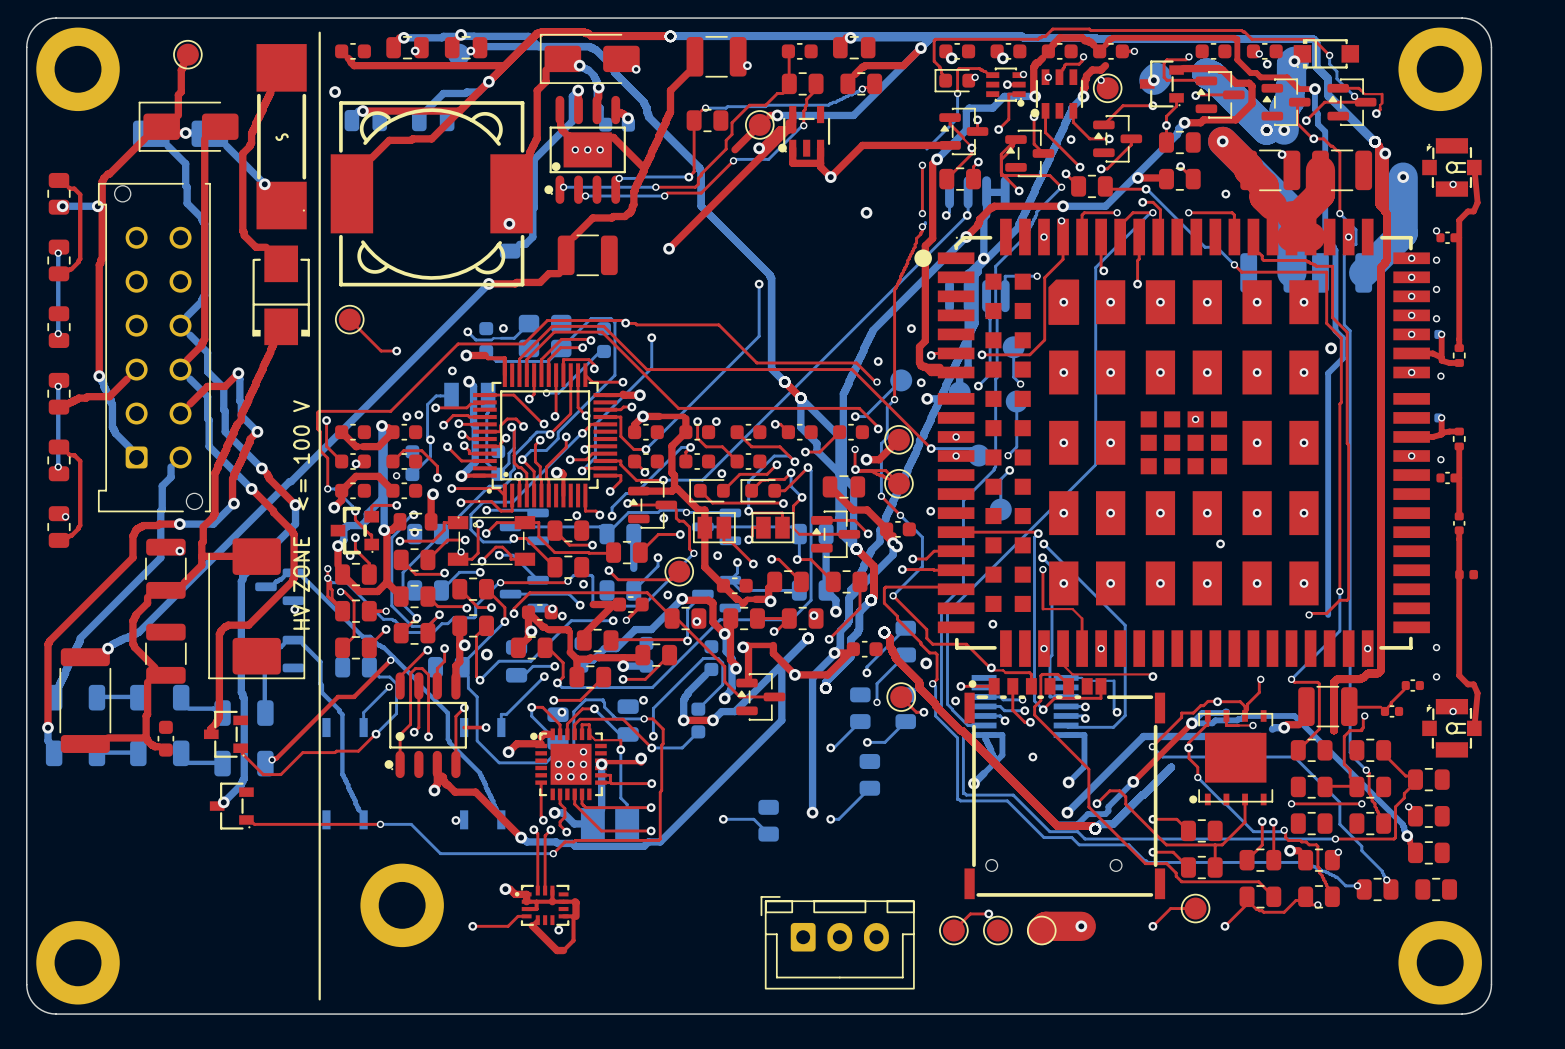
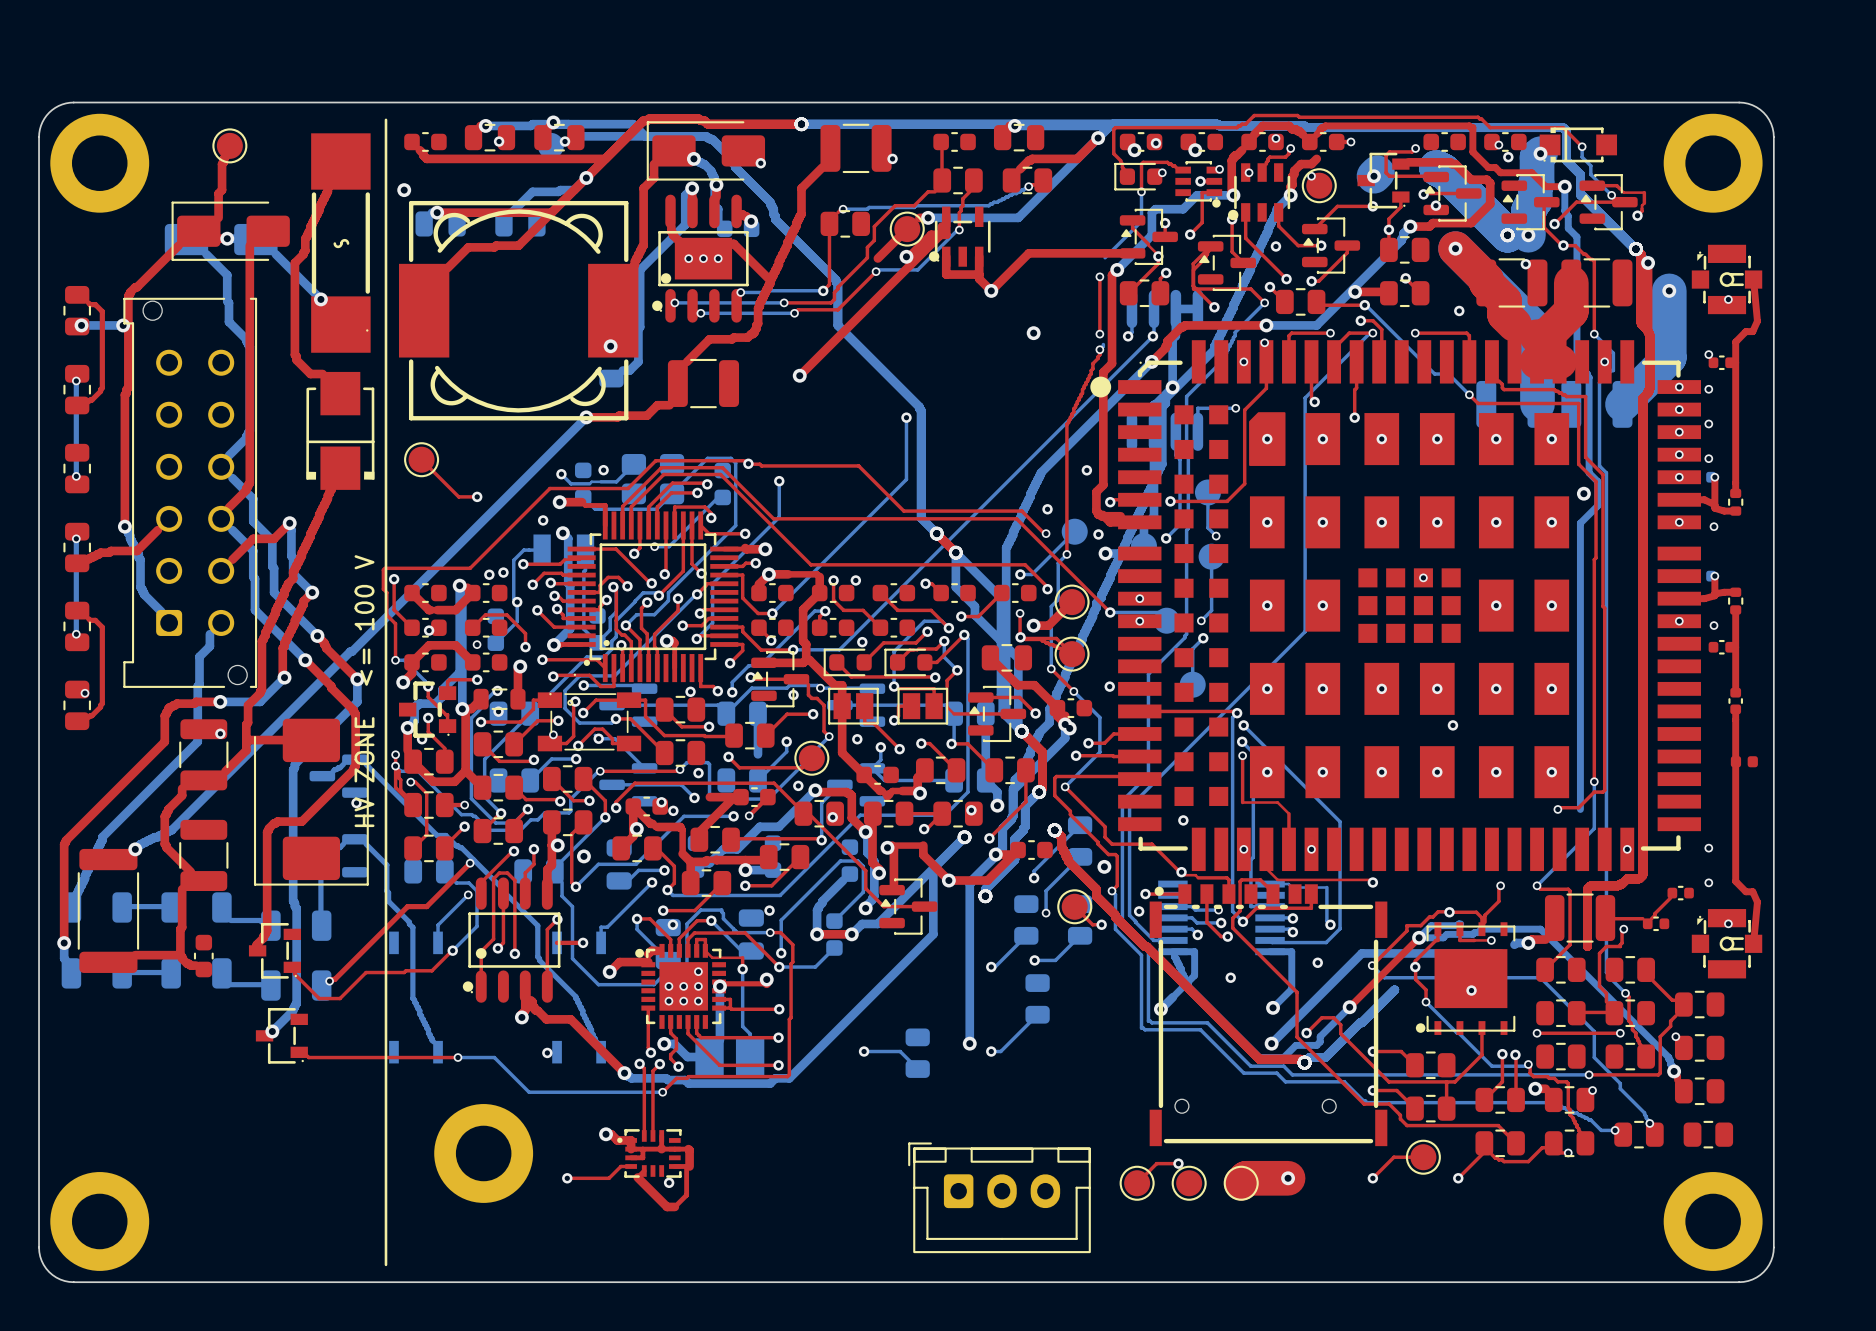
via: none -> (1275, 138)
via: none -> (1155, 143)
via: none -> (1435, 205)
via: none -> (1317, 962)
via: none -> (1471, 990)

